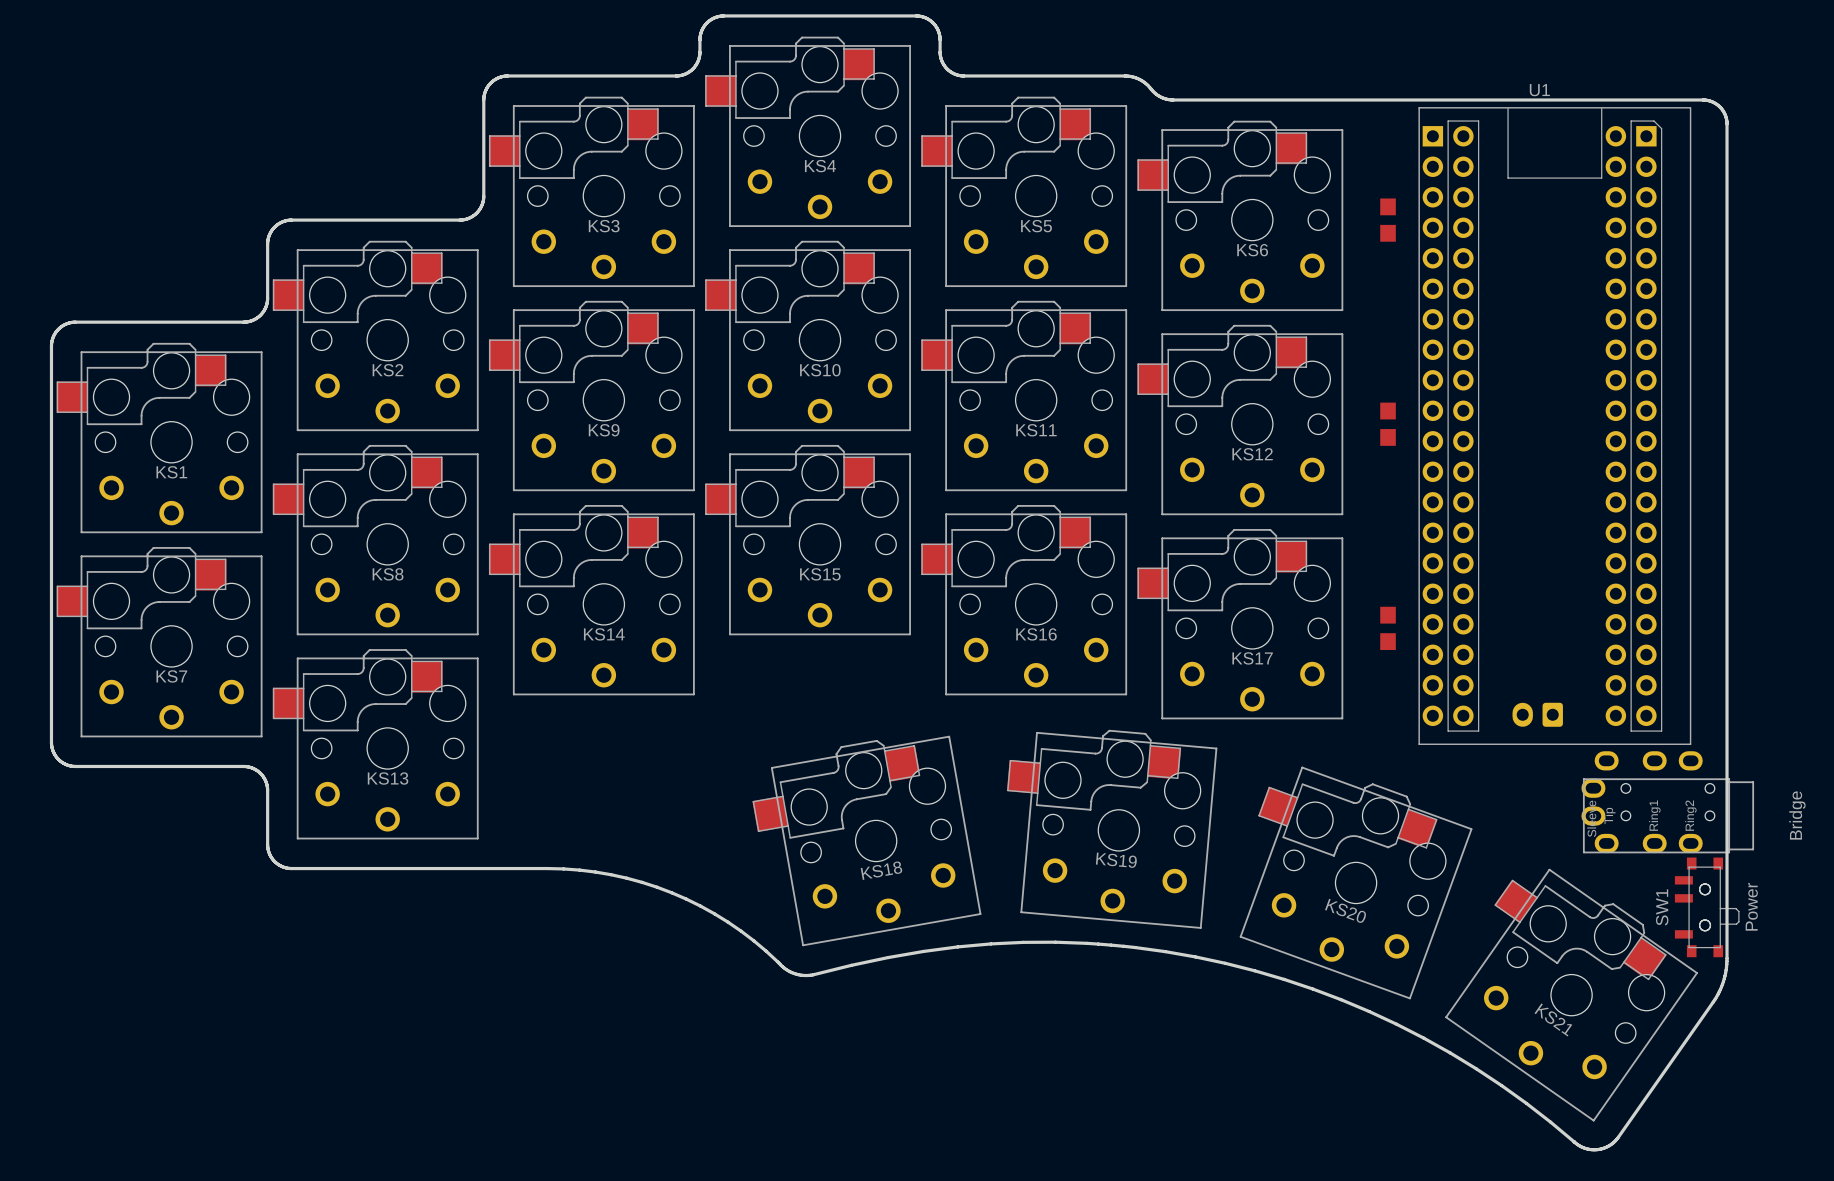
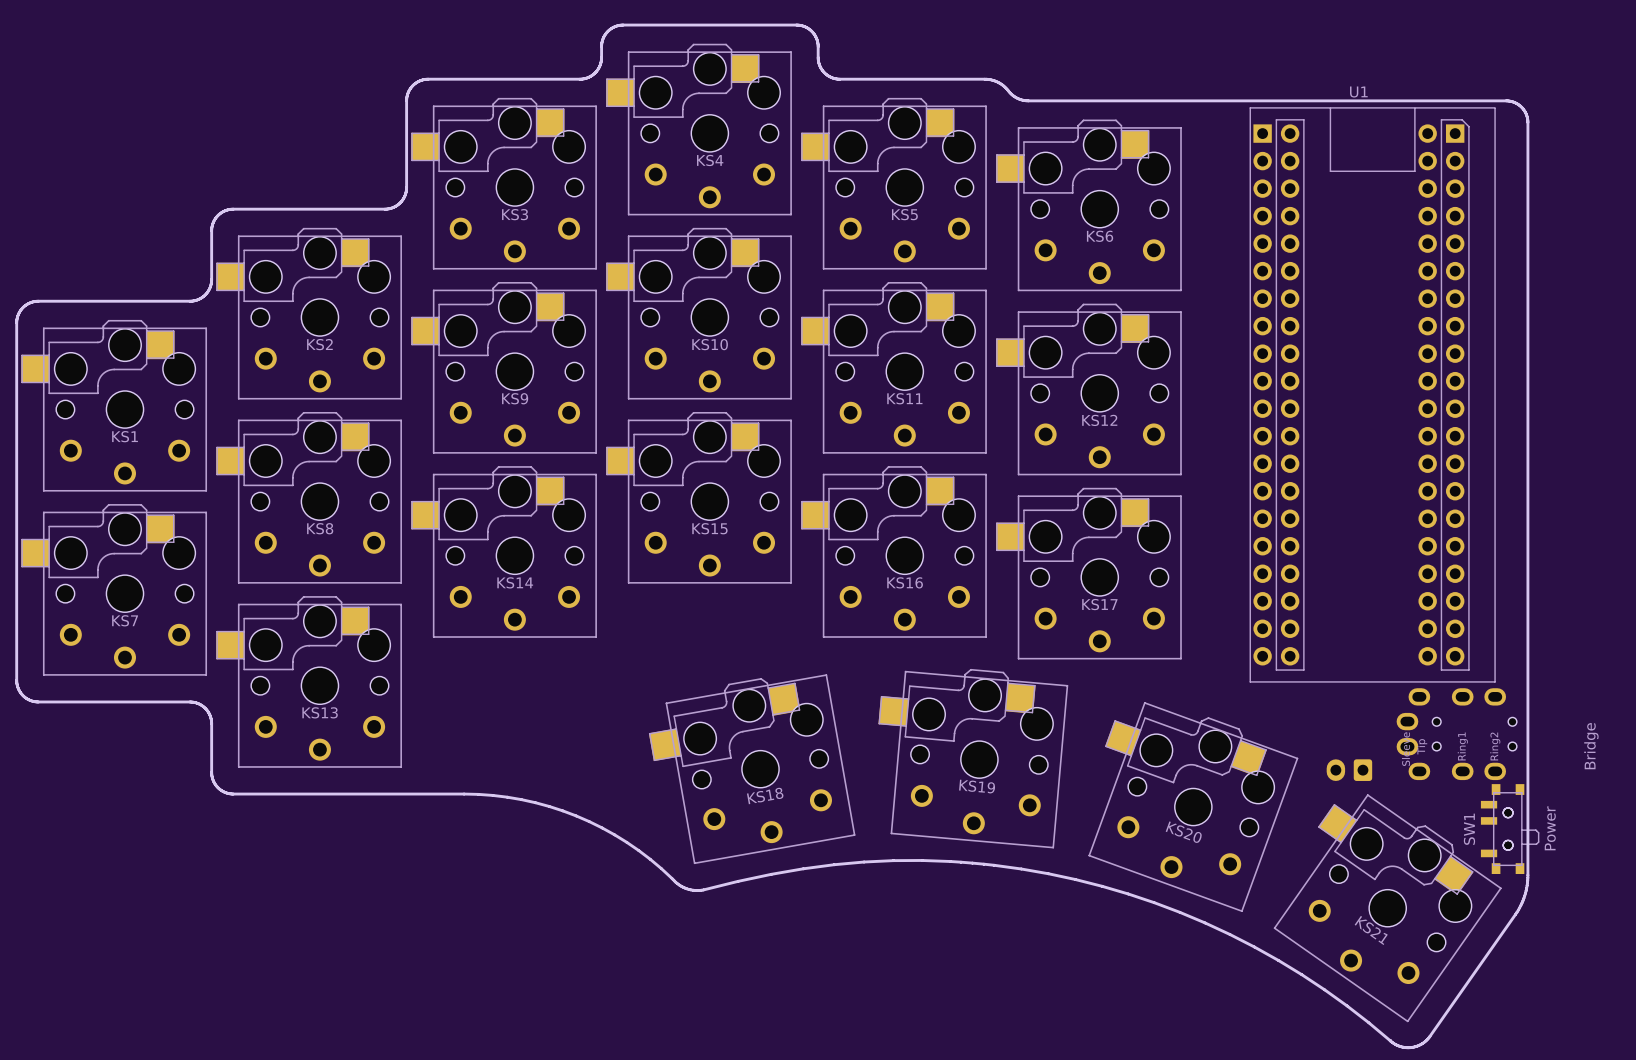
part: (1388, 220) -> none
part: (1388, 424) -> none
part: (1388, 628) -> none
part position: (1537, 714) -> (1349, 770)
part: none -> Bridge (1456, 734)
part: Bridge (1667, 802) -> none

